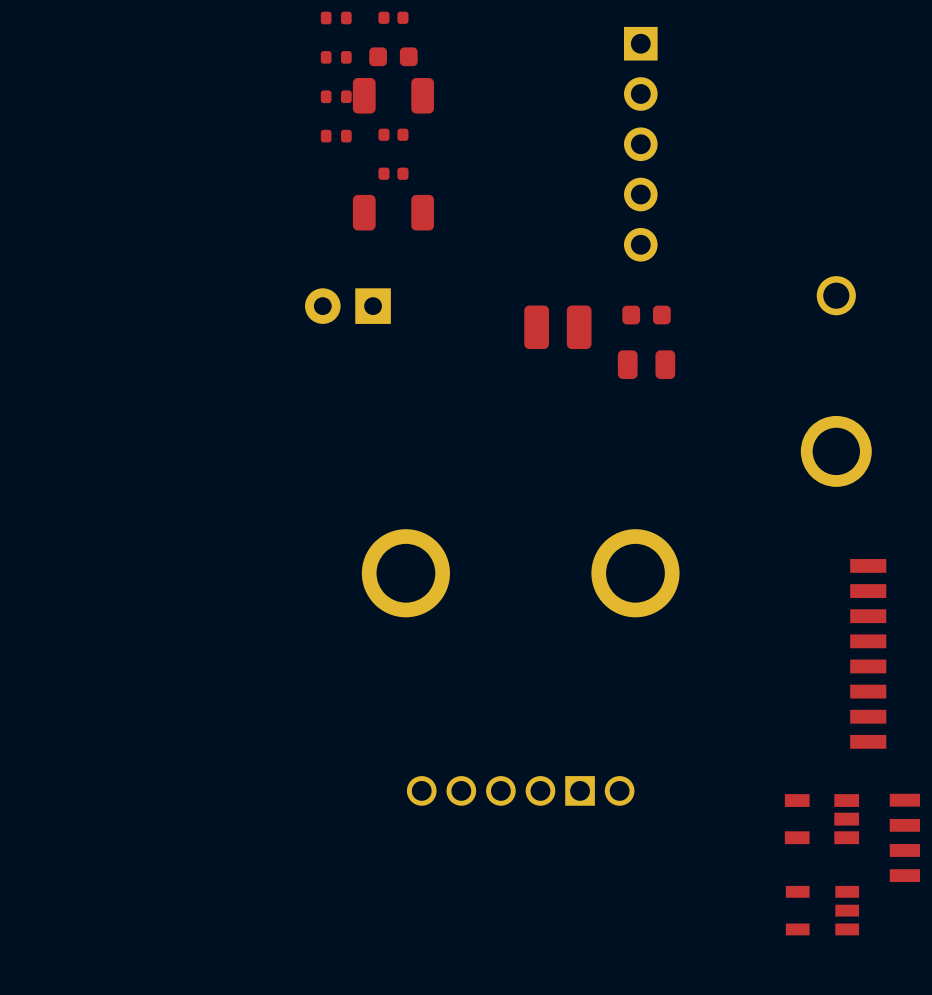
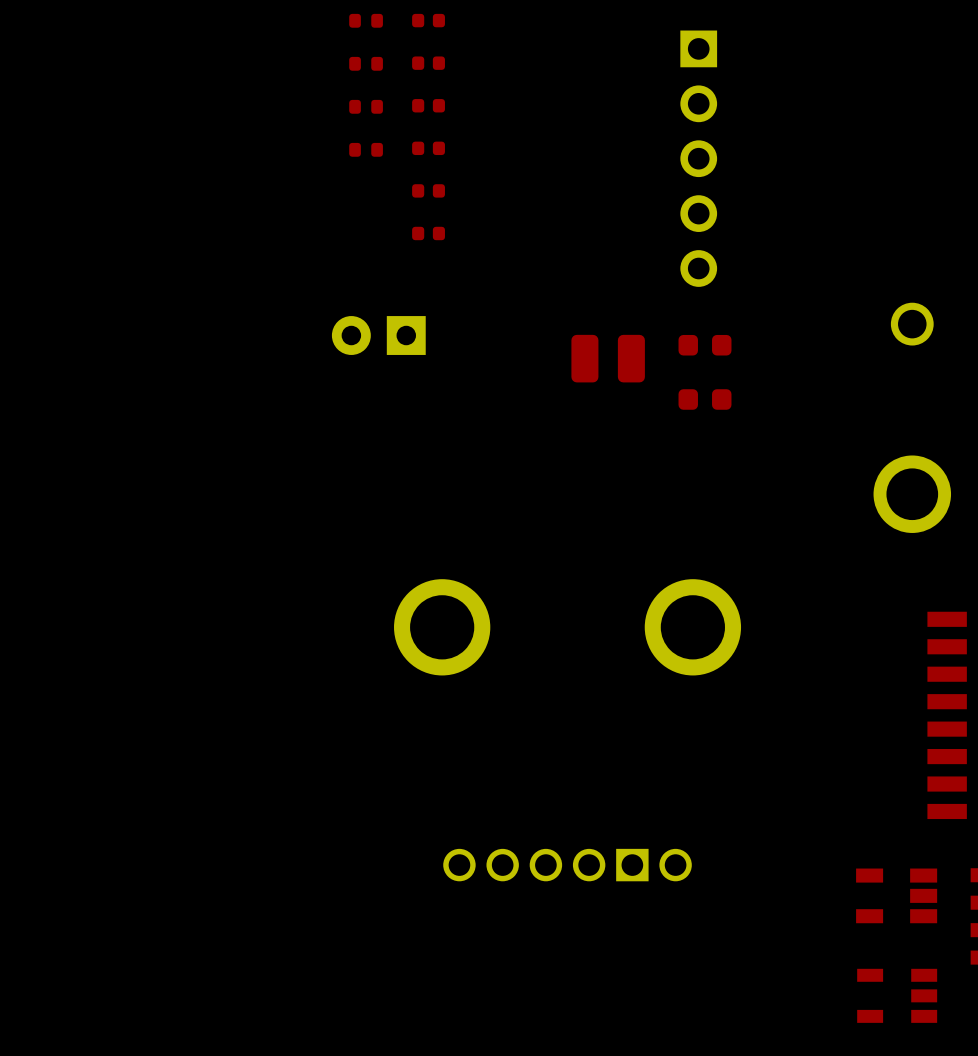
part footprint: [369, 47, 418, 67] -> [412, 56, 445, 70]
part footprint: [352, 77, 435, 114] -> [412, 99, 445, 113]
part footprint: [352, 194, 435, 231] -> [412, 226, 445, 241]
part footprint: [617, 350, 676, 380] -> [678, 389, 732, 410]

